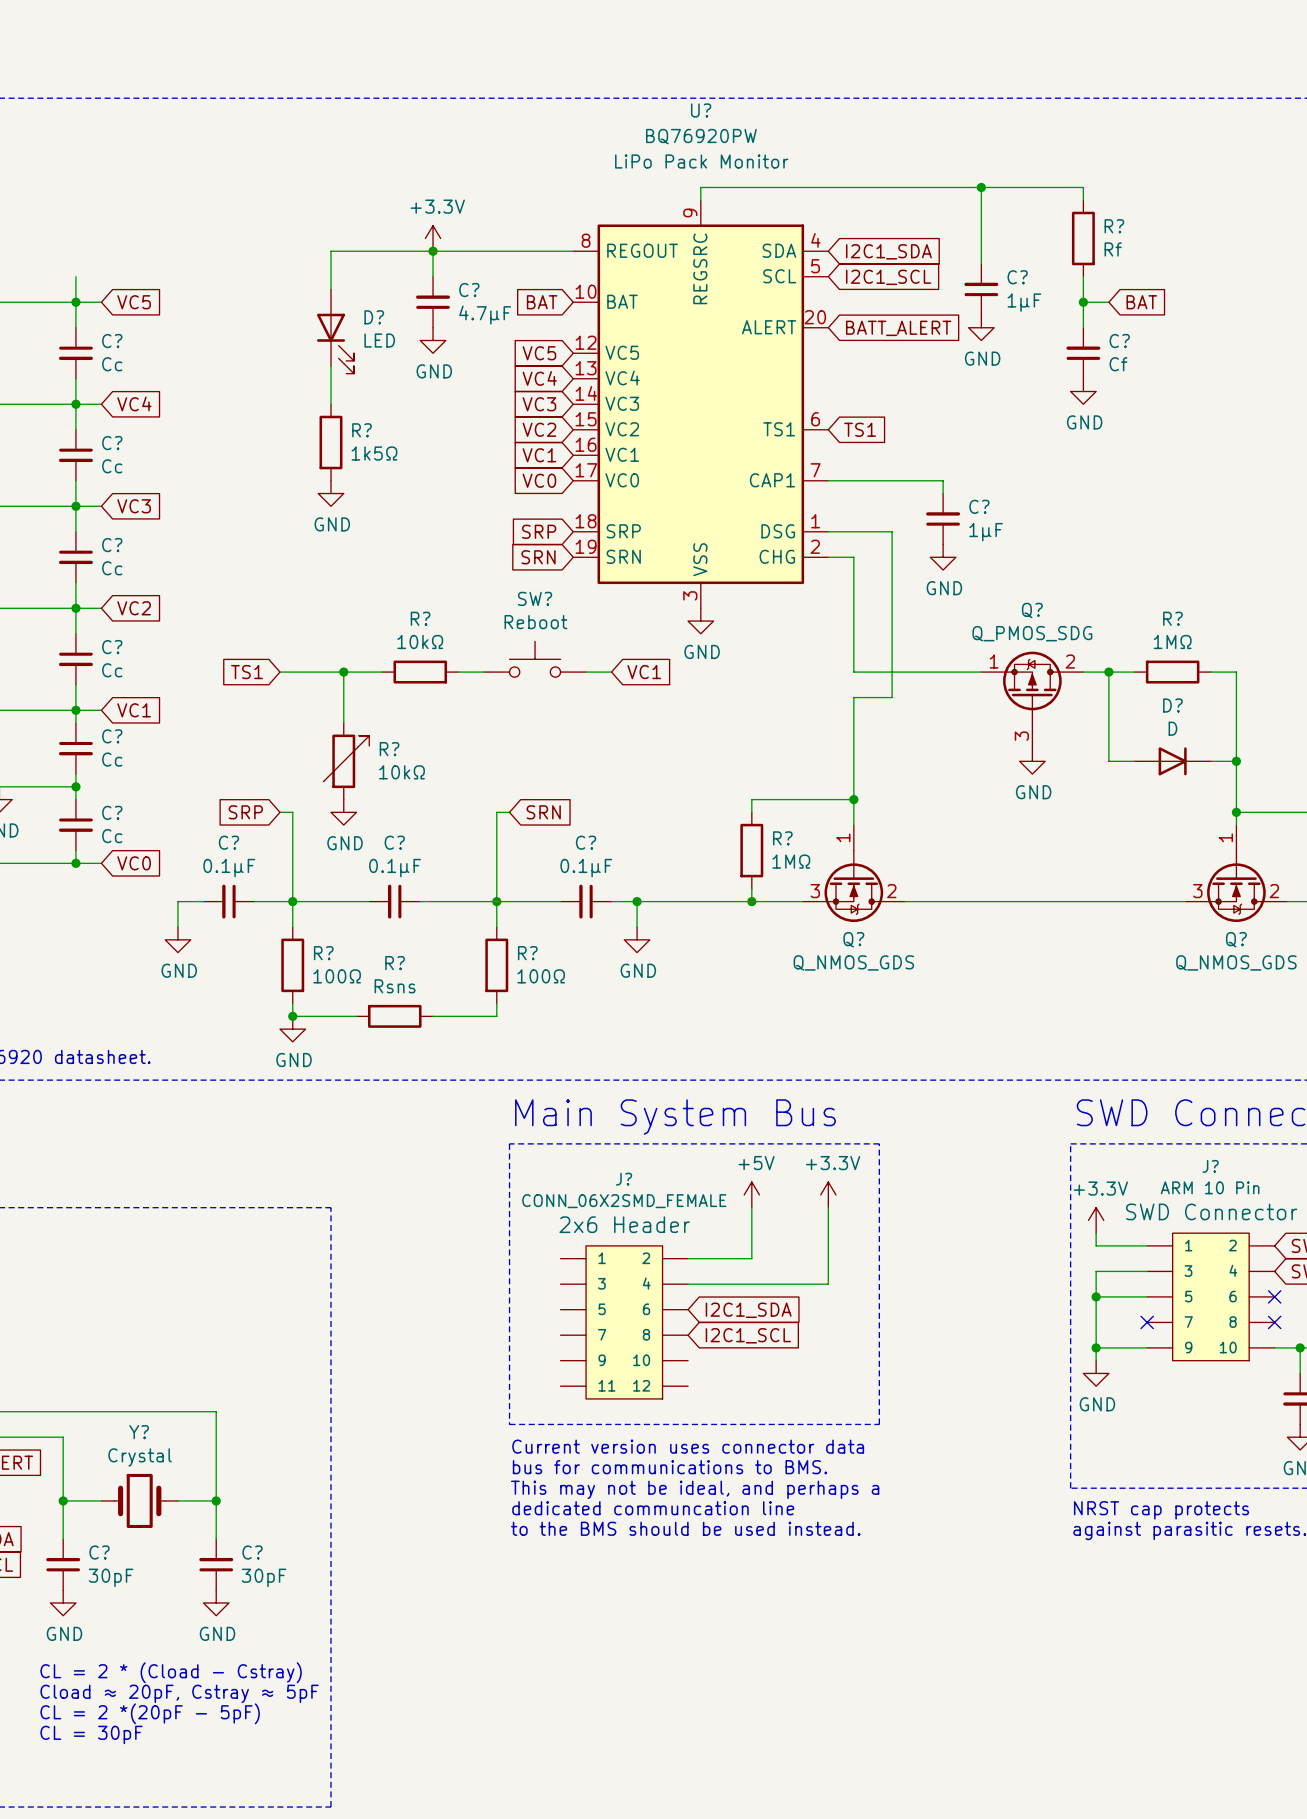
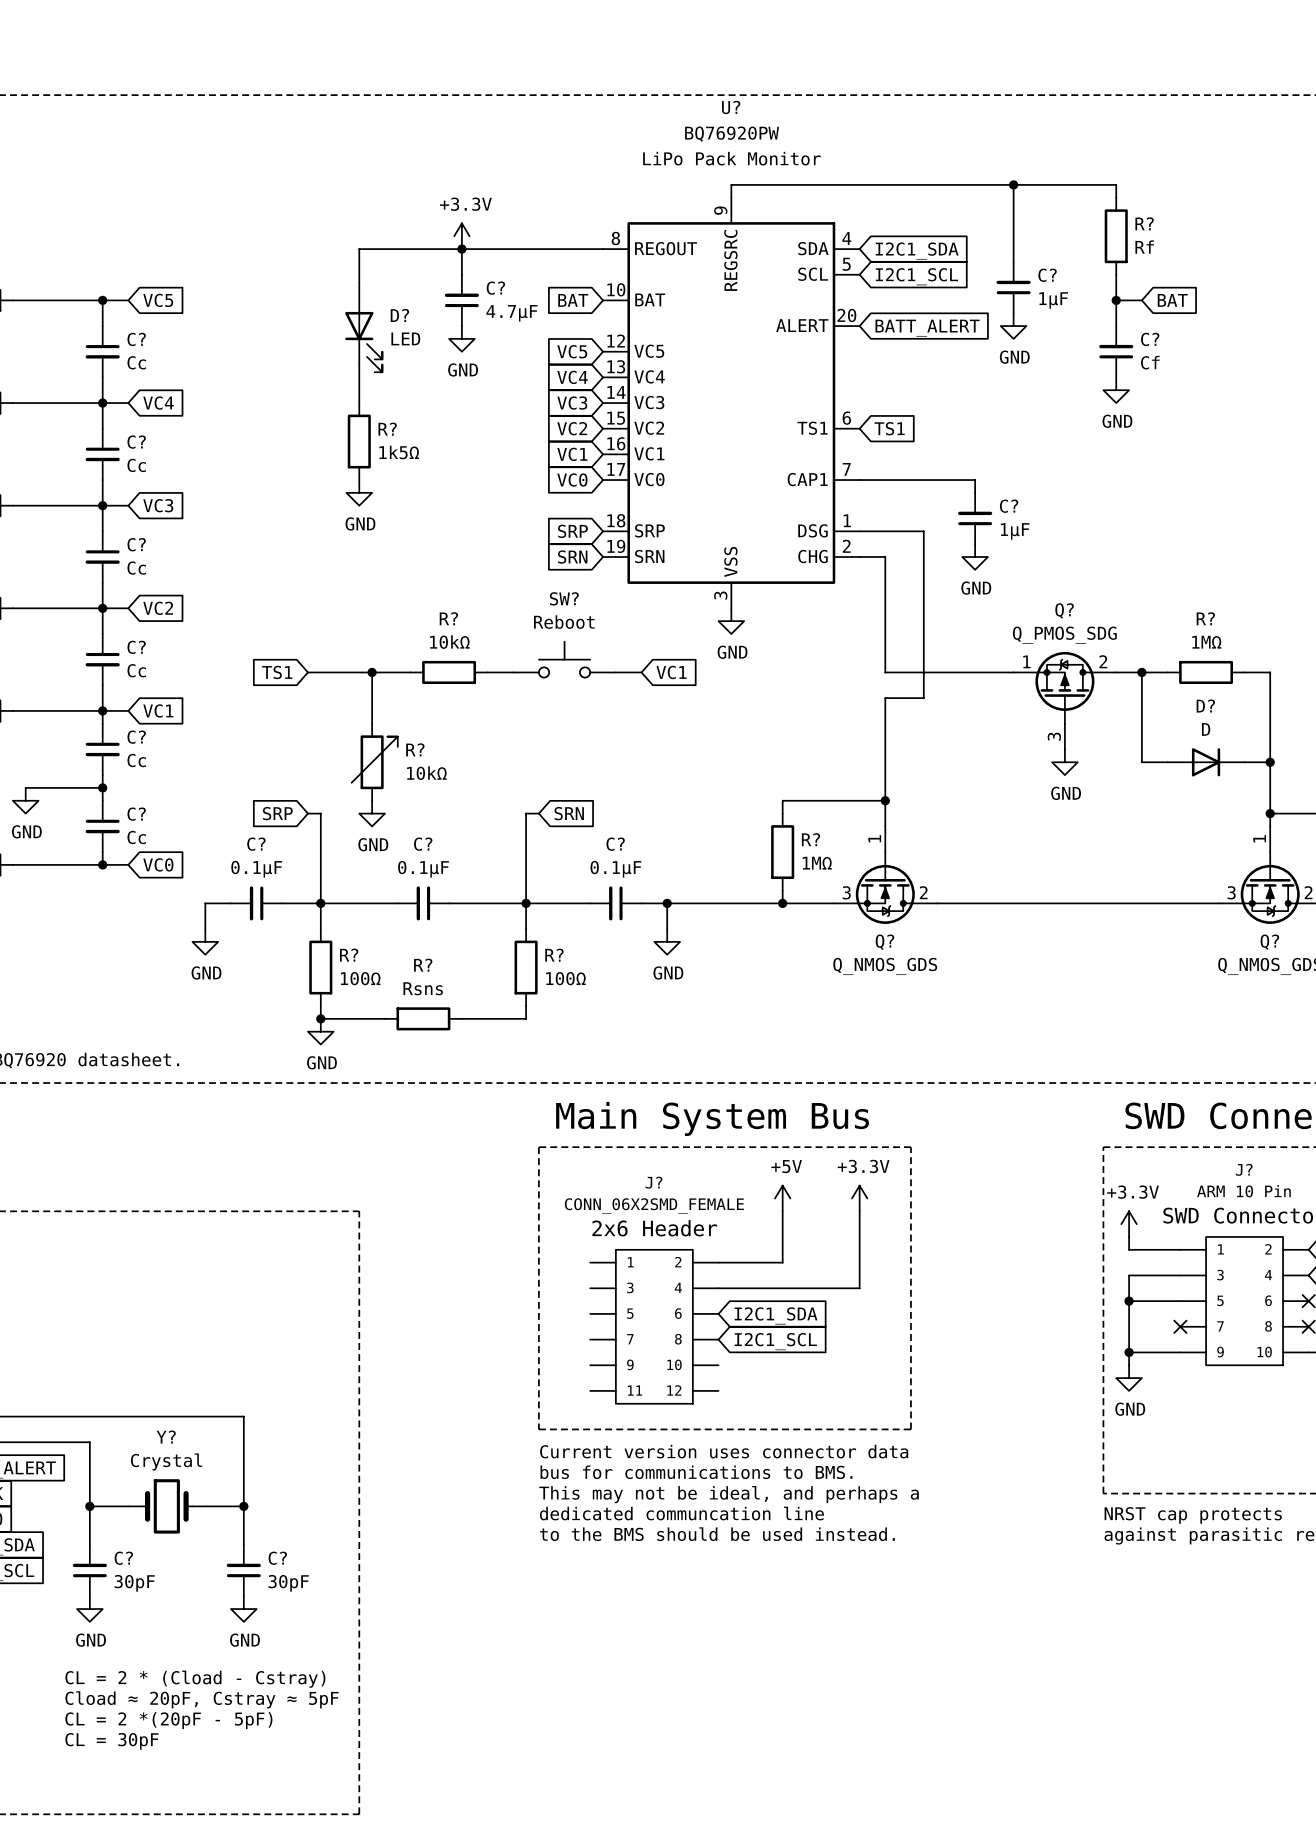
wire: (75, 276) (75, 302) -> none

